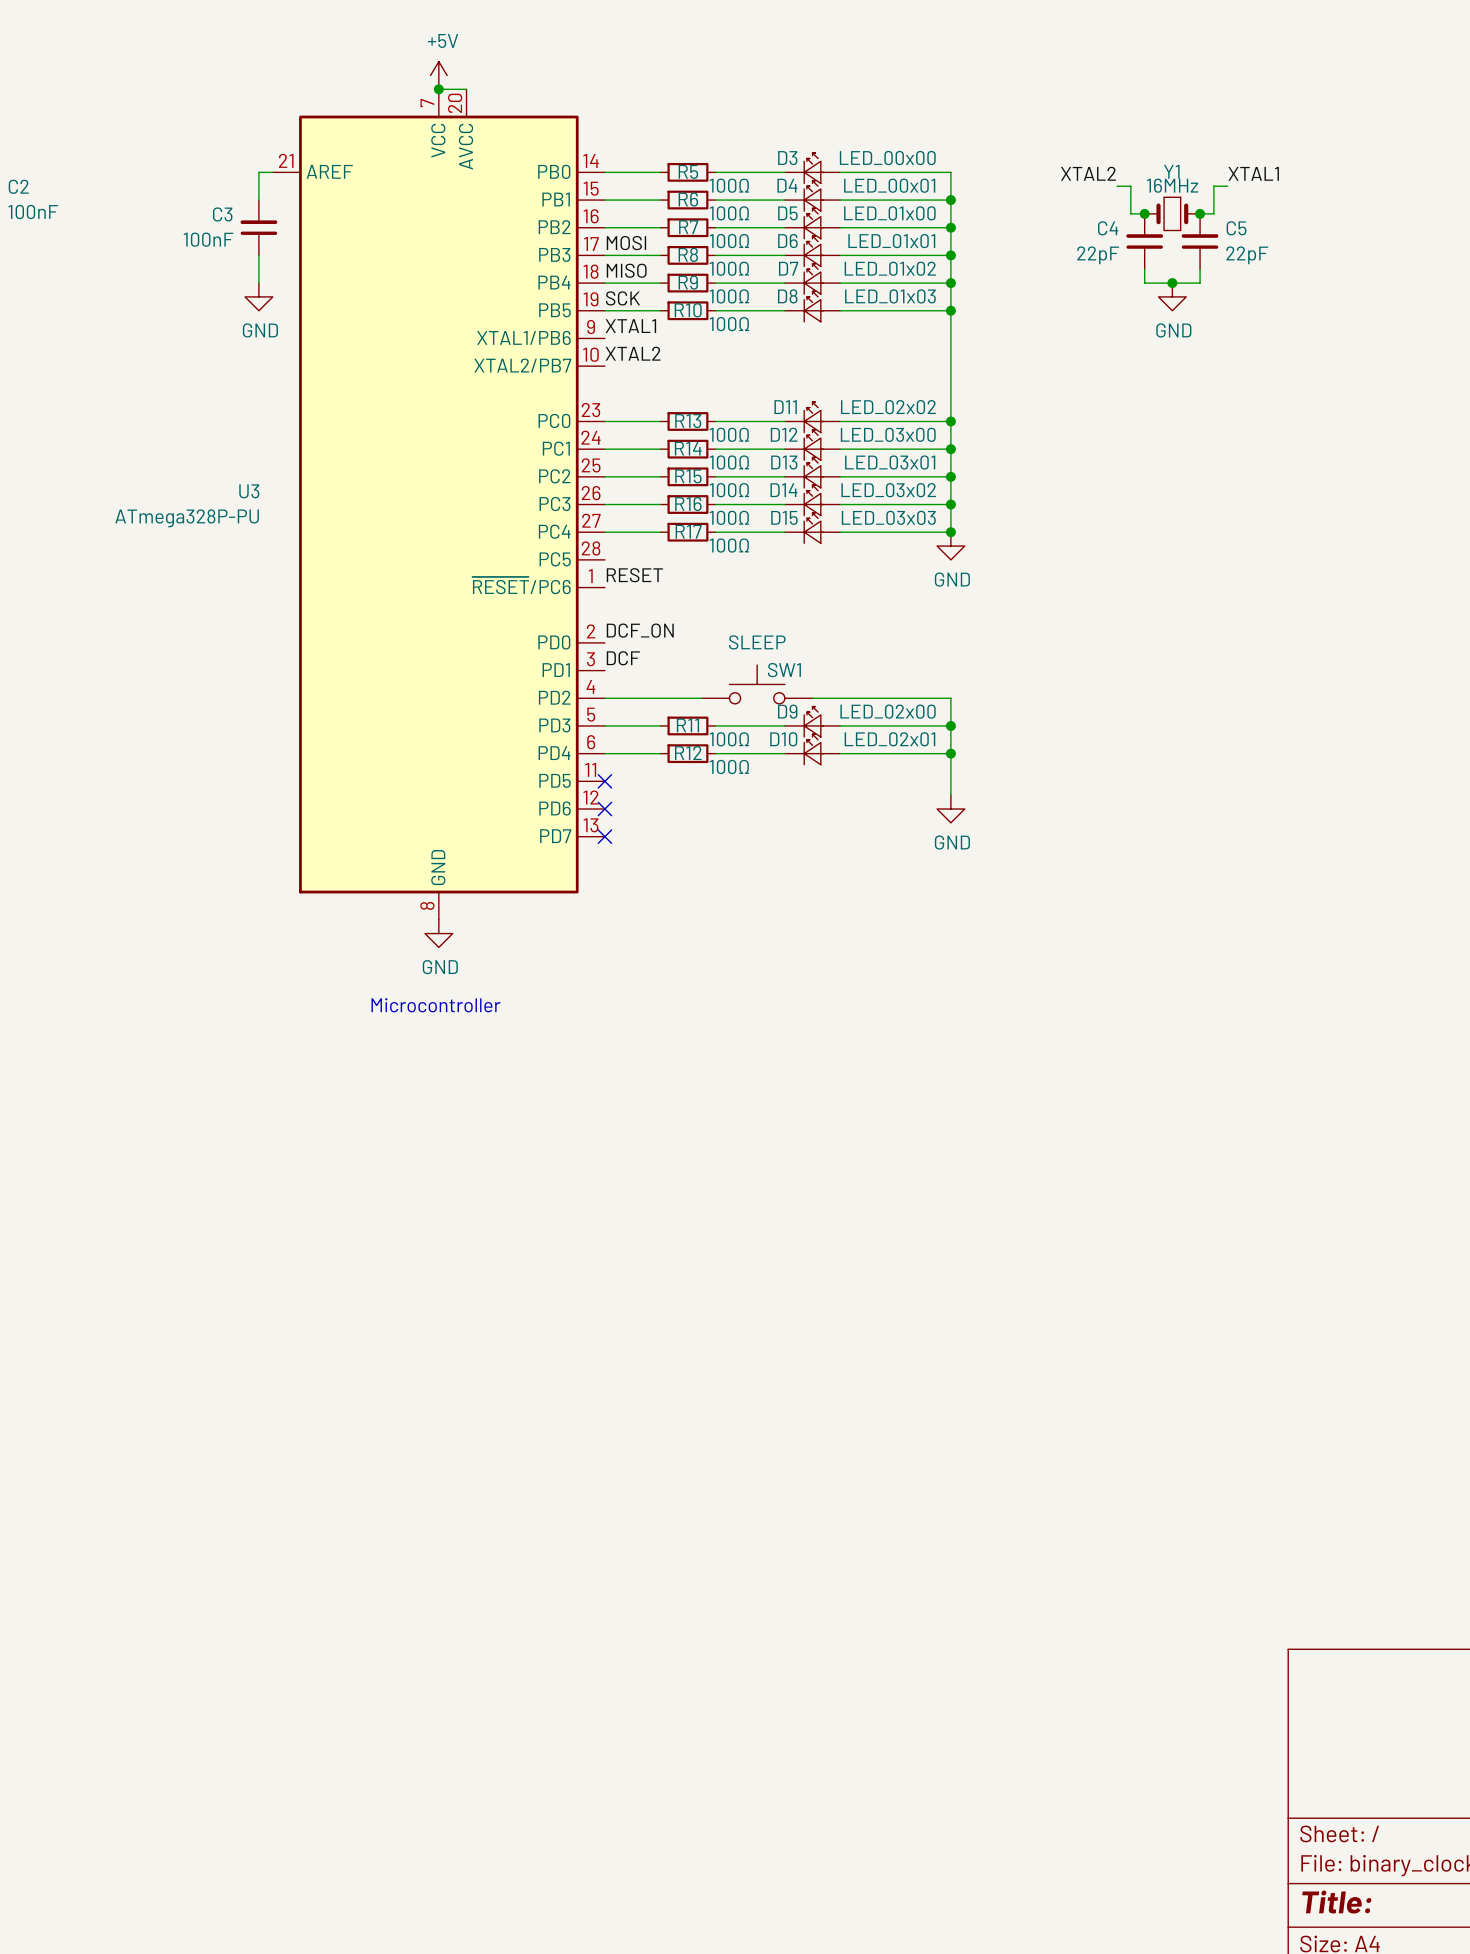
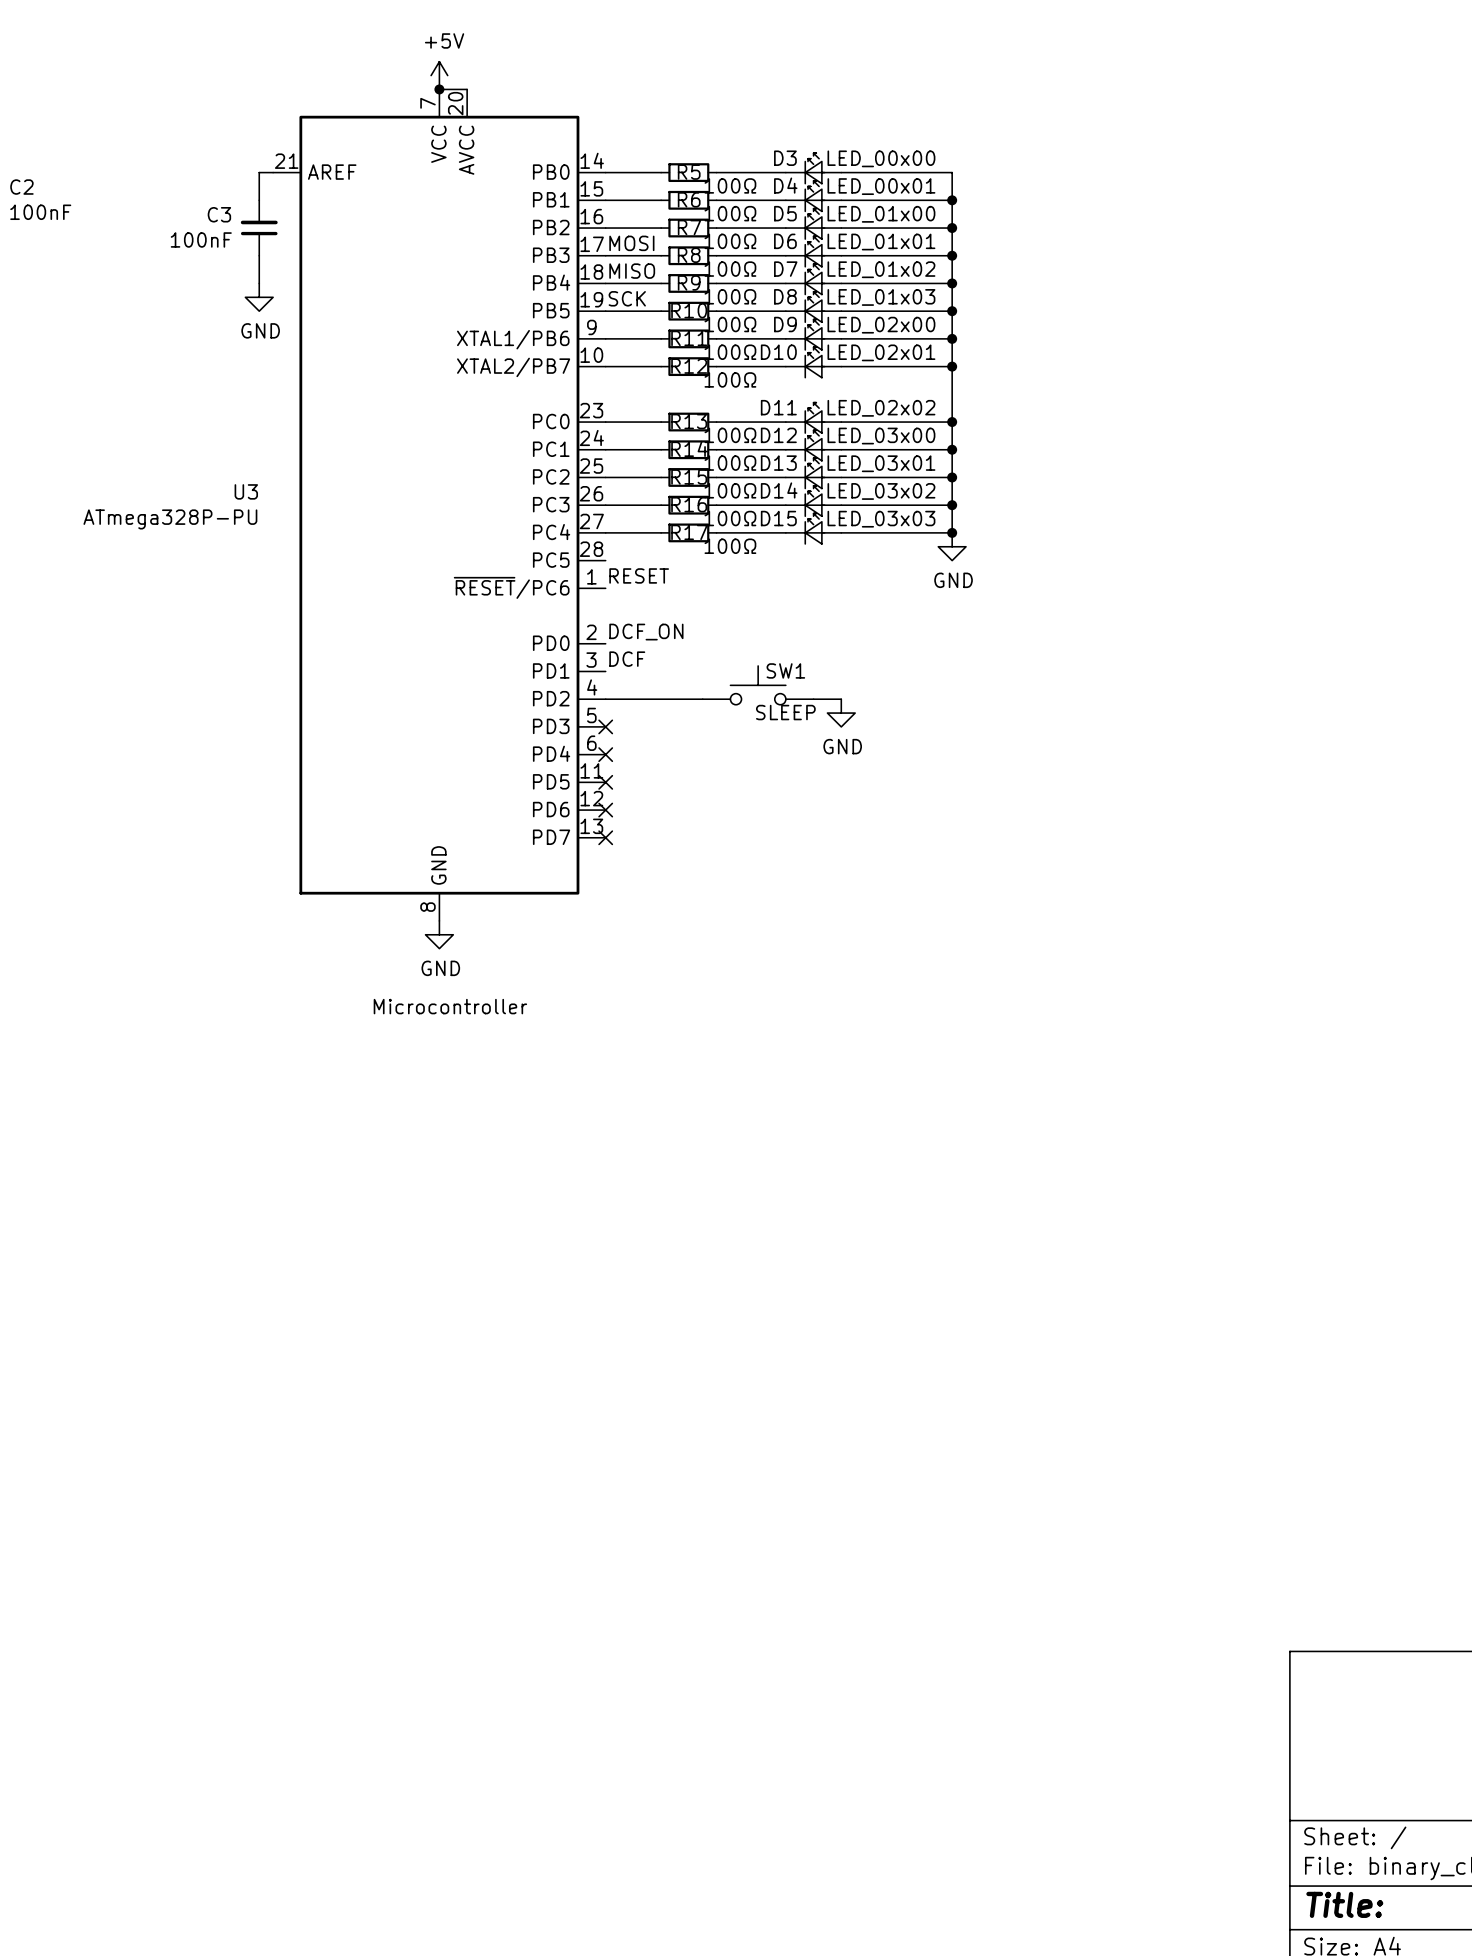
label: XTAL2 (1088, 173) -> none
label: XTAL1 (1253, 173) -> none
wire: (1117, 186) (1130, 186) (1130, 213) (1144, 213) -> none
wire: (1227, 186) (1213, 186) (1213, 213) (1200, 213) -> none
junction: (1144, 213) -> none
Y1: 16MHz (1172, 213) -> none
junction: (1200, 213) -> none
C4: 22pF (1144, 241) -> none
C5: 22pF (1200, 241) -> none
wire: (1144, 269) (1144, 283) (1200, 283) (1200, 269) -> none
junction: (1172, 283) -> none
power symbol: GND (1172, 296) -> none
label: XTAL1 (630, 326) -> none
wire: none -> (605, 338) (661, 338)
wire: none -> (716, 338) (785, 338)
wire: none -> (841, 338) (952, 338)
junction: none -> (952, 338)
label: XTAL2 (633, 353) -> none
wire: none -> (605, 366) (661, 366)
wire: none -> (716, 366) (785, 366)
wire: none -> (841, 366) (952, 366)
junction: none -> (952, 366)
SW1 value position: SLEEP (757, 642) -> SLEEP (785, 712)
wire: (840, 698) (950, 698) (950, 795) -> none
D9 position: (812, 721) -> (813, 334)
wire: (604, 725) (660, 725) -> none
no-connect mark: none -> (605, 726)
R11 position: (687, 725) -> (688, 338)
wire: (715, 725) (784, 725) -> none
wire: (840, 725) (950, 725) -> none
junction: (950, 725) -> none
D10 position: (812, 749) -> (813, 362)
wire: (604, 753) (660, 753) -> none
no-connect mark: none -> (605, 754)
R12 position: (687, 753) -> (688, 366)
wire: (715, 753) (784, 753) -> none
wire: (840, 753) (950, 753) -> none
junction: (950, 753) -> none
power symbol position: GND (950, 809) -> GND (841, 713)

